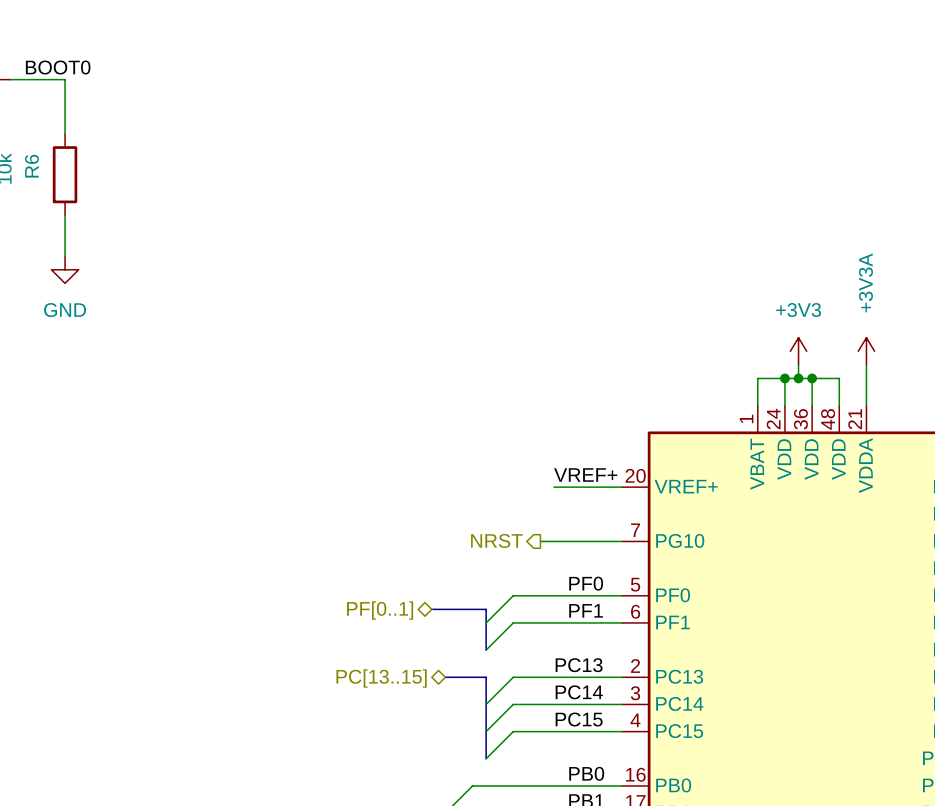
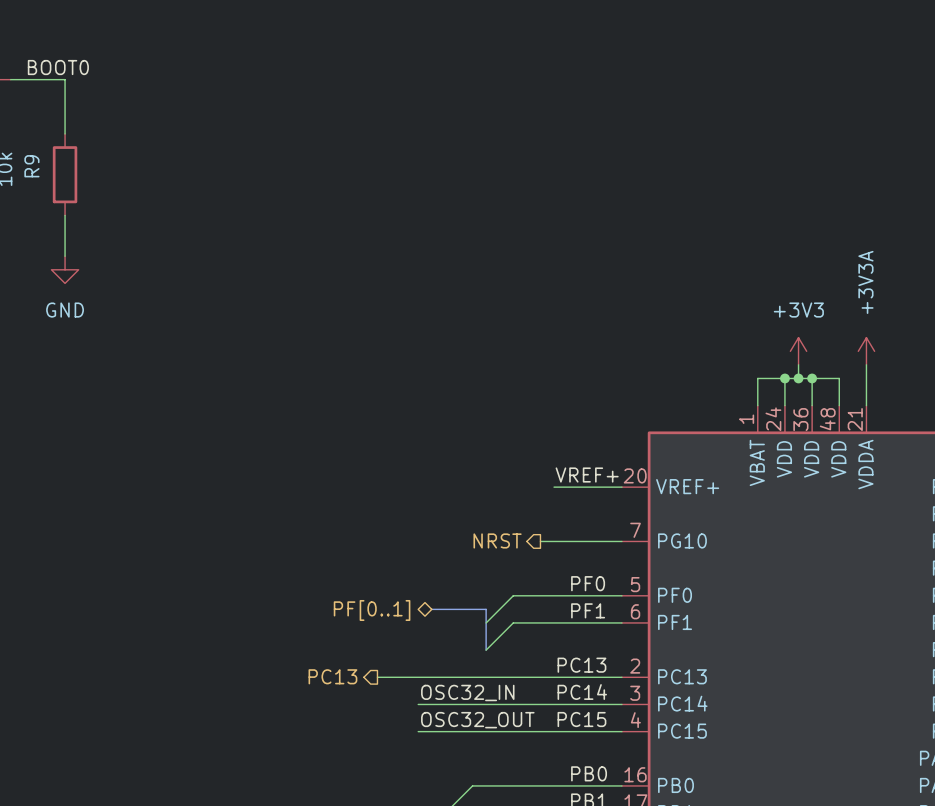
R6 name: R6 (31, 166) -> R9 (31, 166)
hierarchical label: none -> PC13 (332, 676)
bus: (445, 677) (486, 677) (486, 758) -> none
wire: (513, 677) (486, 704) -> (513, 677) (377, 677)
hierarchical label: PC[13..15] (381, 678) -> none
label: none -> OSC32_IN (467, 692)
wire: (513, 704) (486, 731) -> (513, 704) (418, 704)
label: none -> OSC32_OUT (477, 720)
wire: (513, 731) (486, 758) -> (513, 731) (418, 731)

